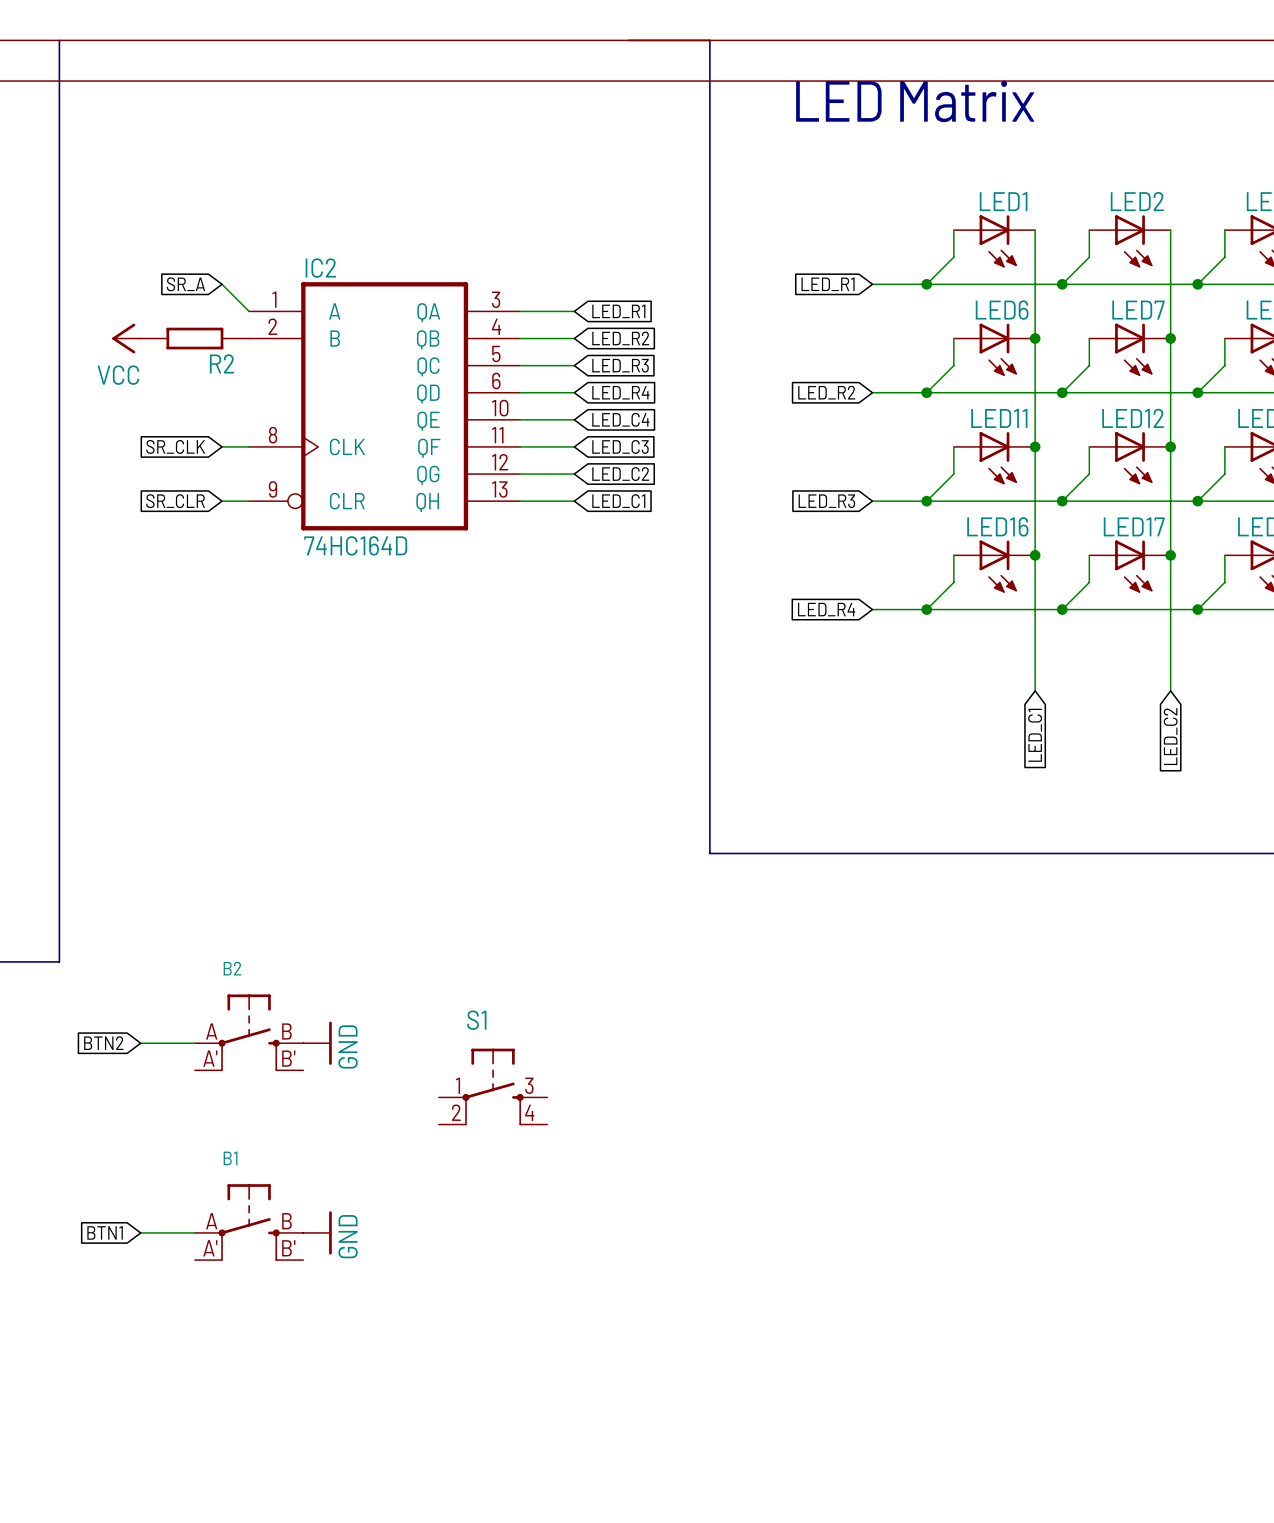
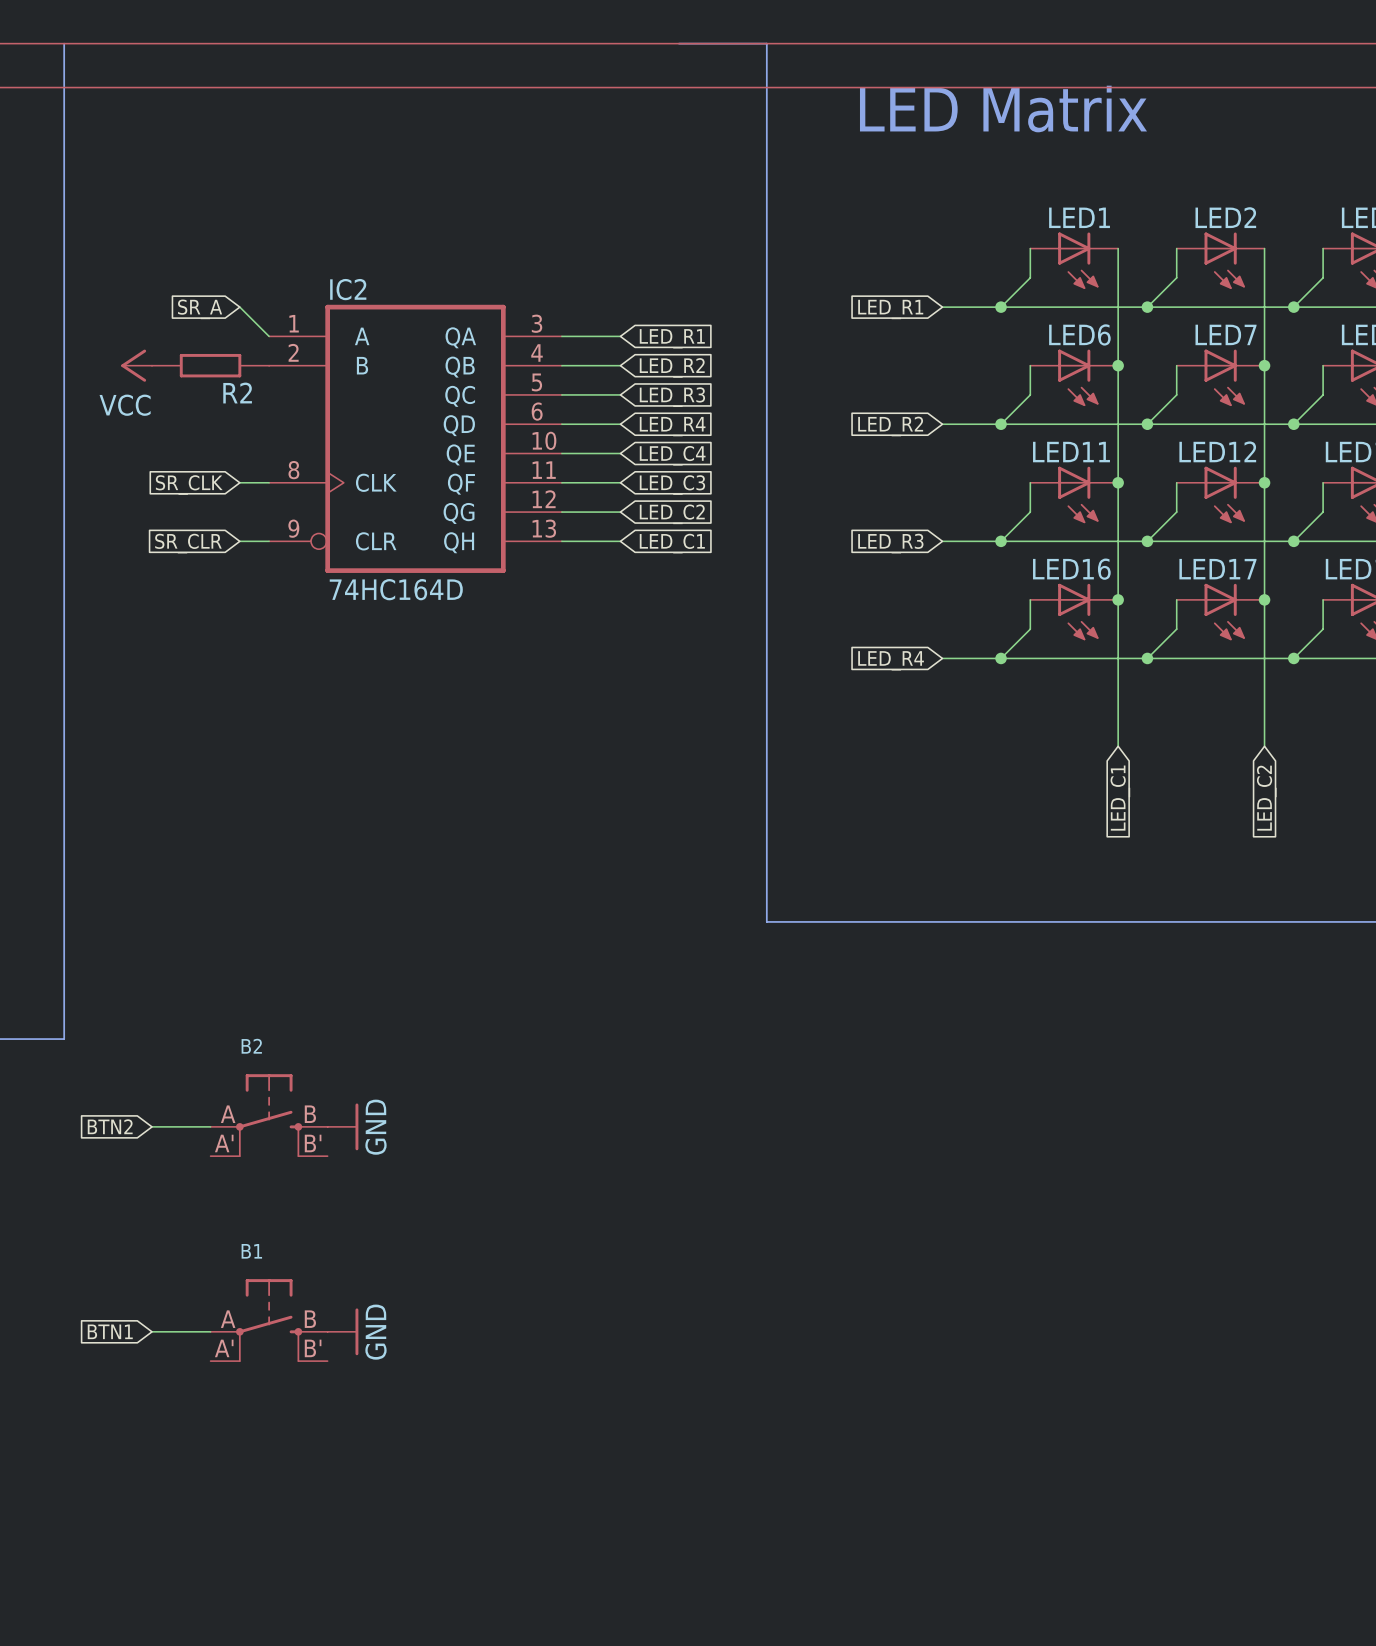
S1: (493, 1086) -> none

